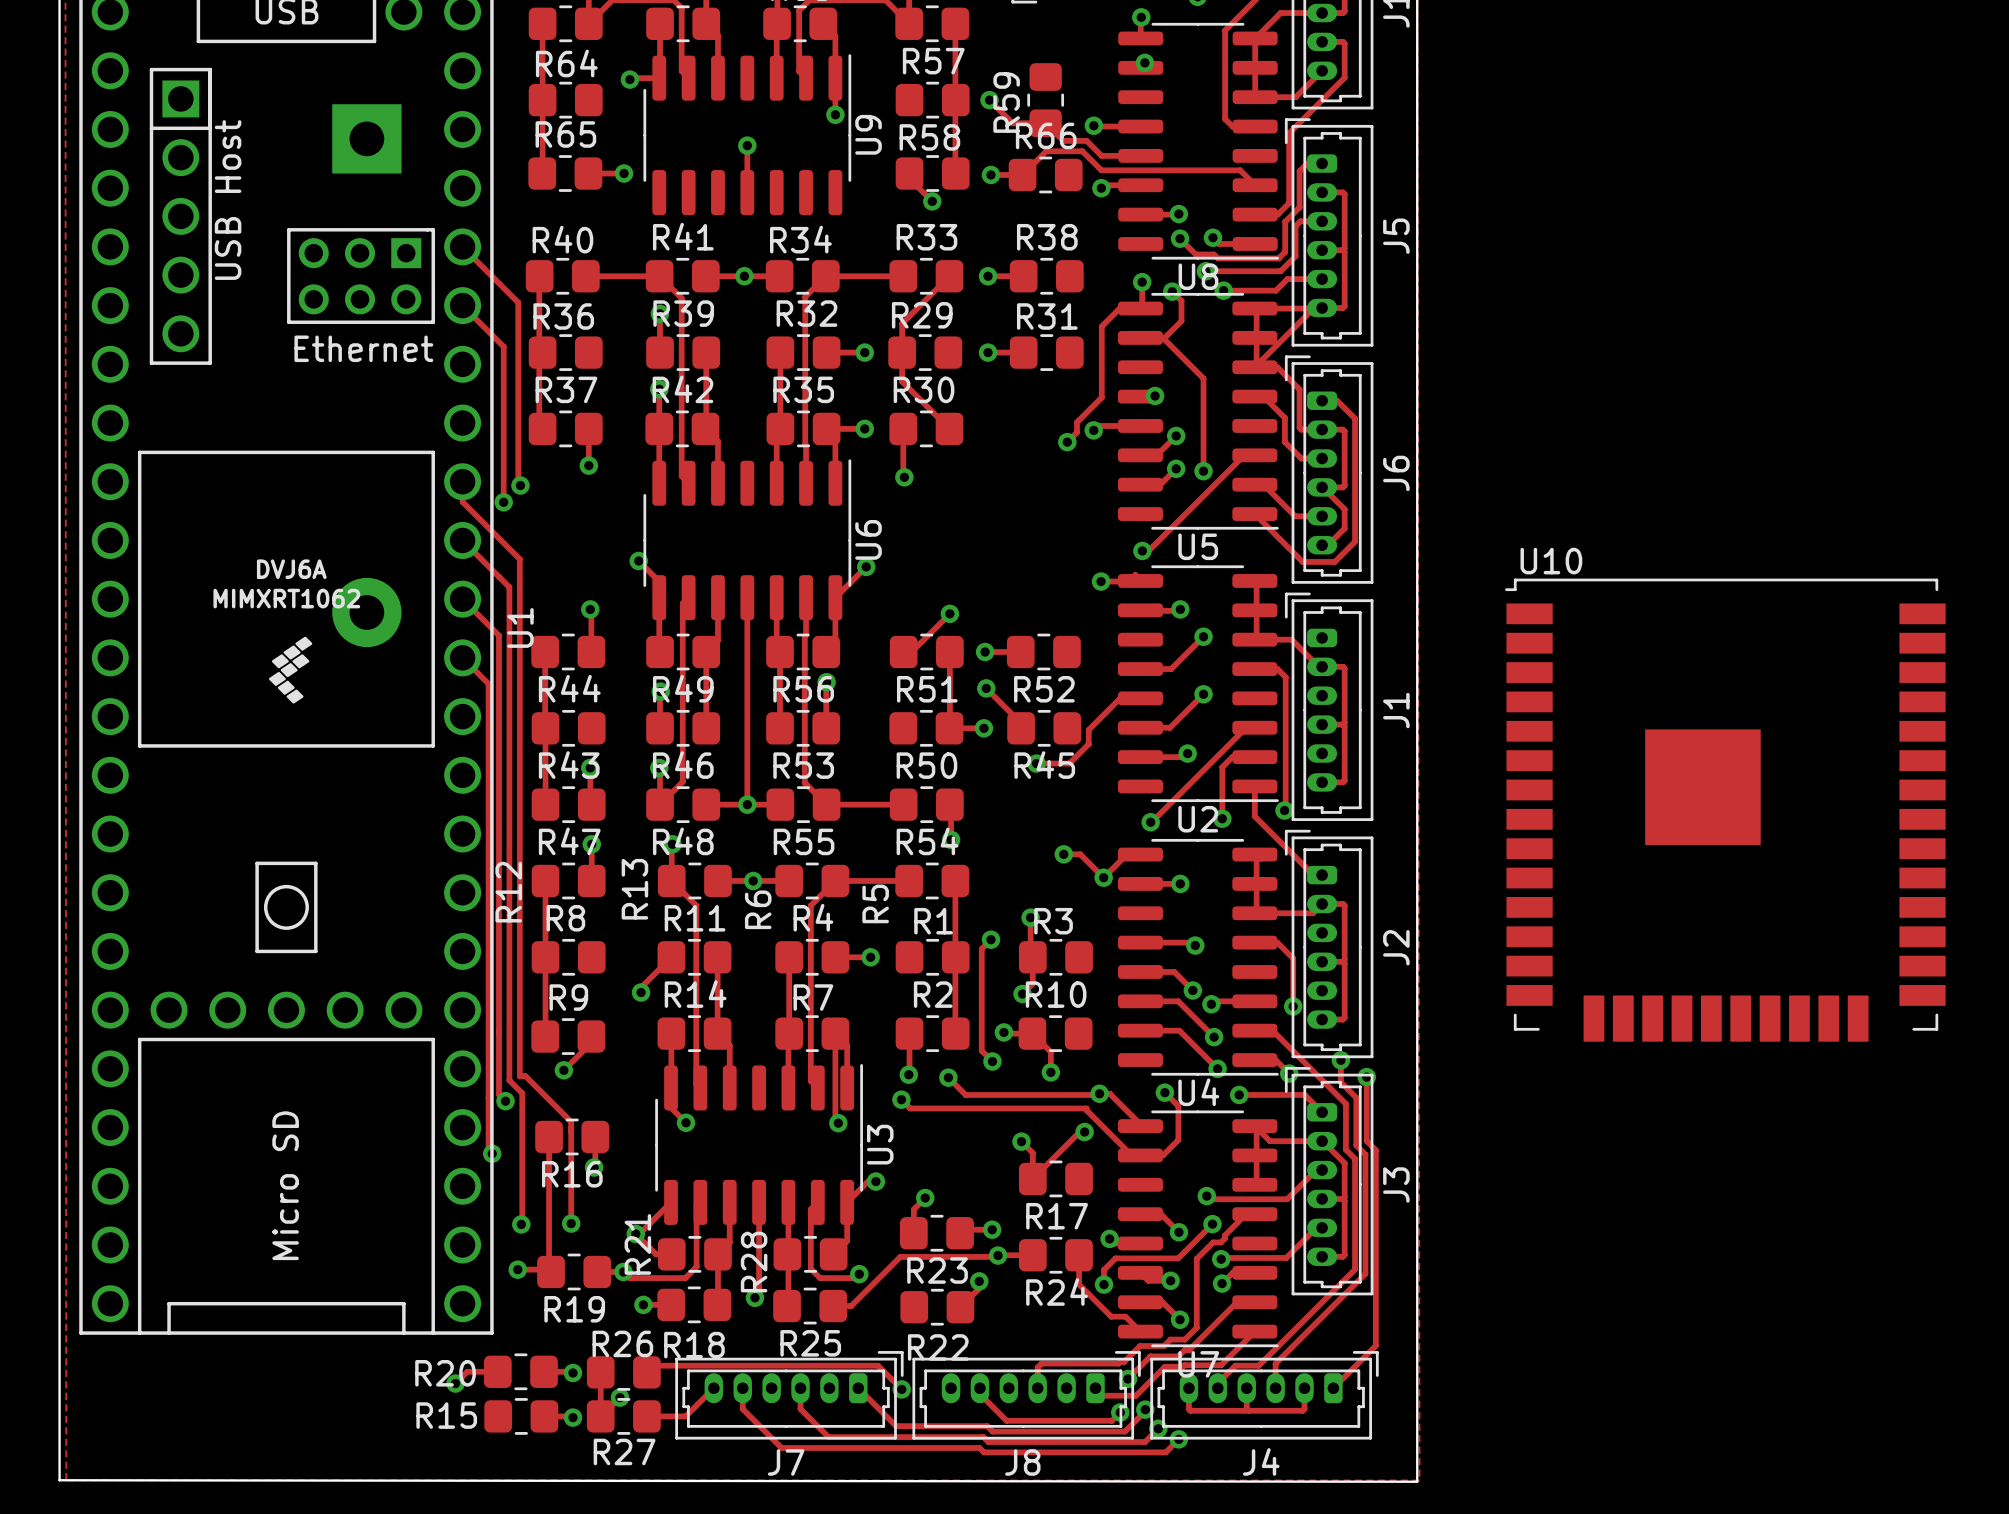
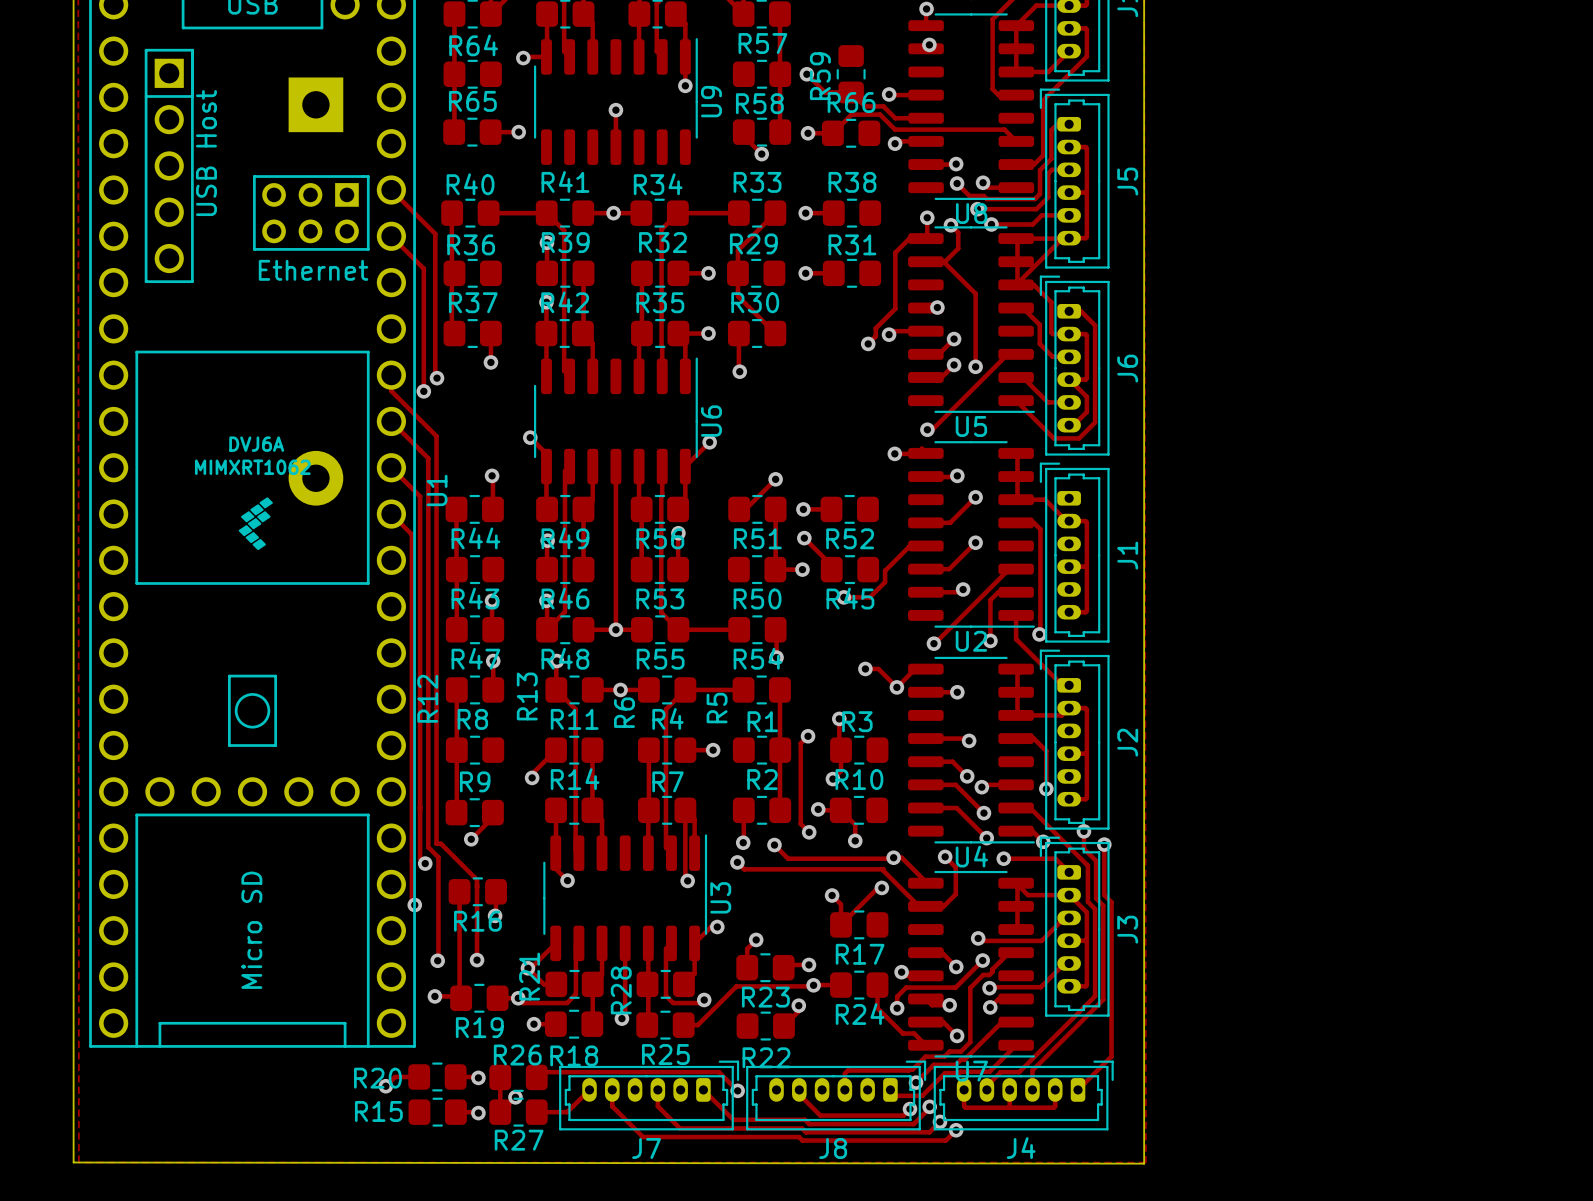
U10: (1725, 810) -> none

